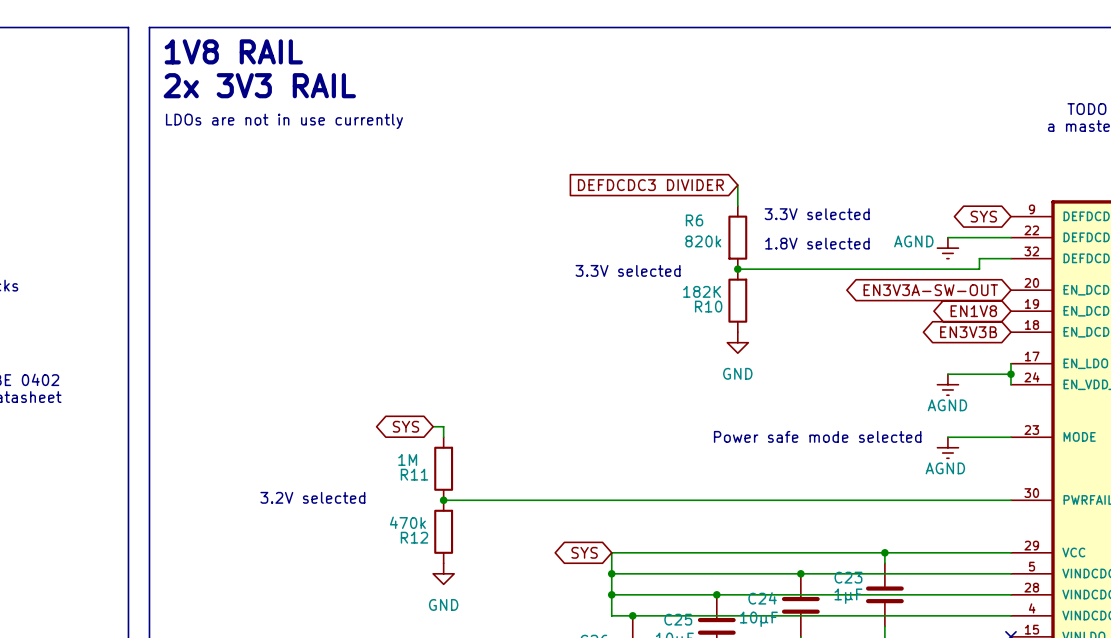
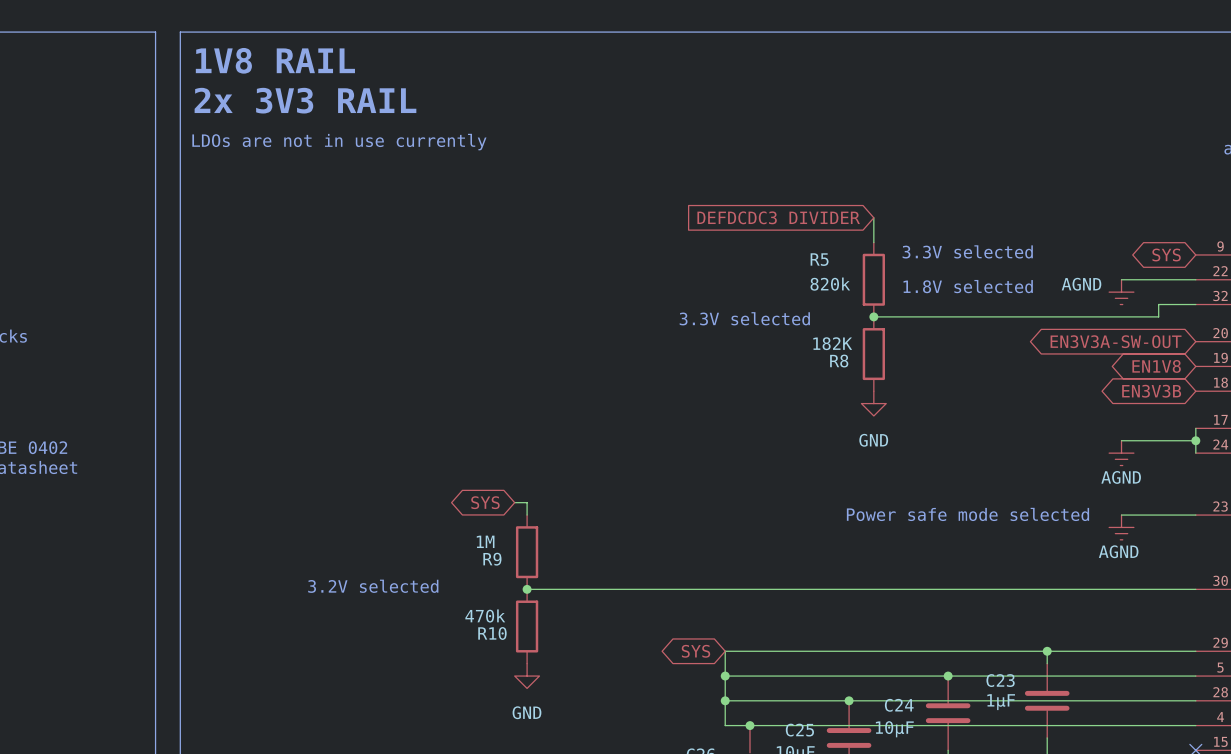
R6 name: R6 (694, 220) -> R5 (819, 259)
R10 name: R10 (708, 306) -> R8 (839, 361)
R11 name: R11 (414, 474) -> R9 (492, 559)
R12 name: R12 (414, 537) -> R10 (492, 633)

